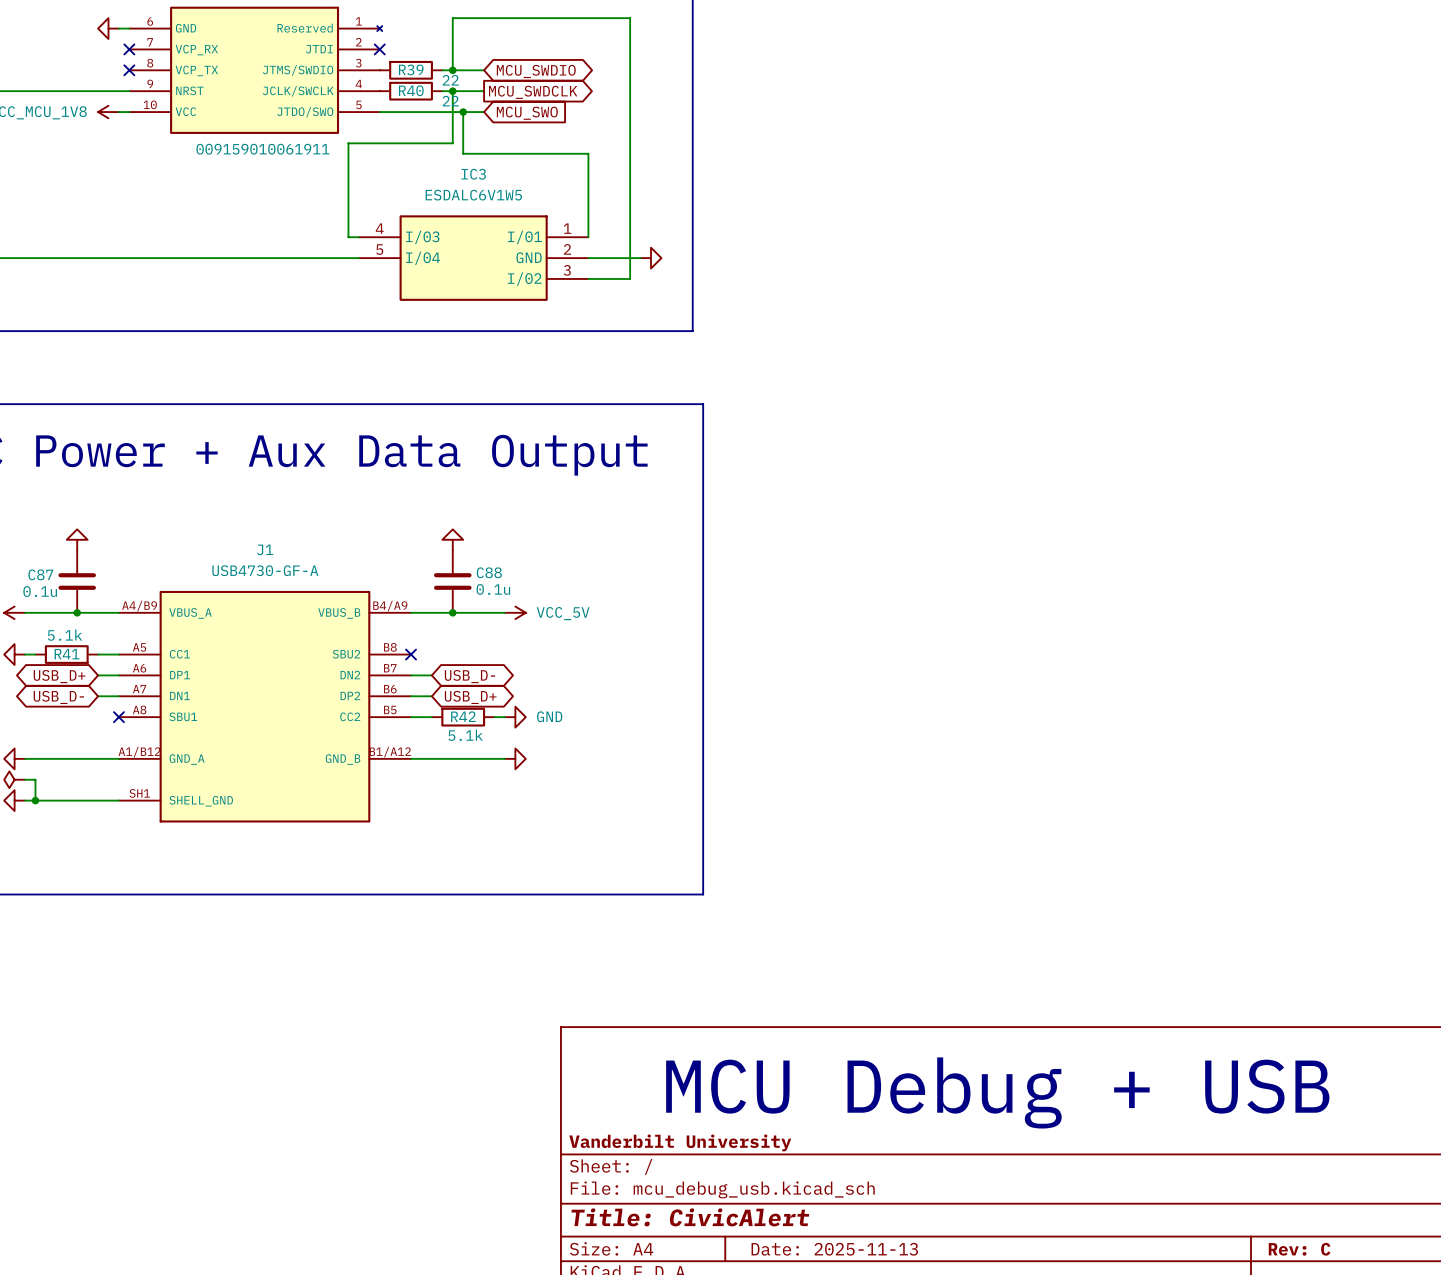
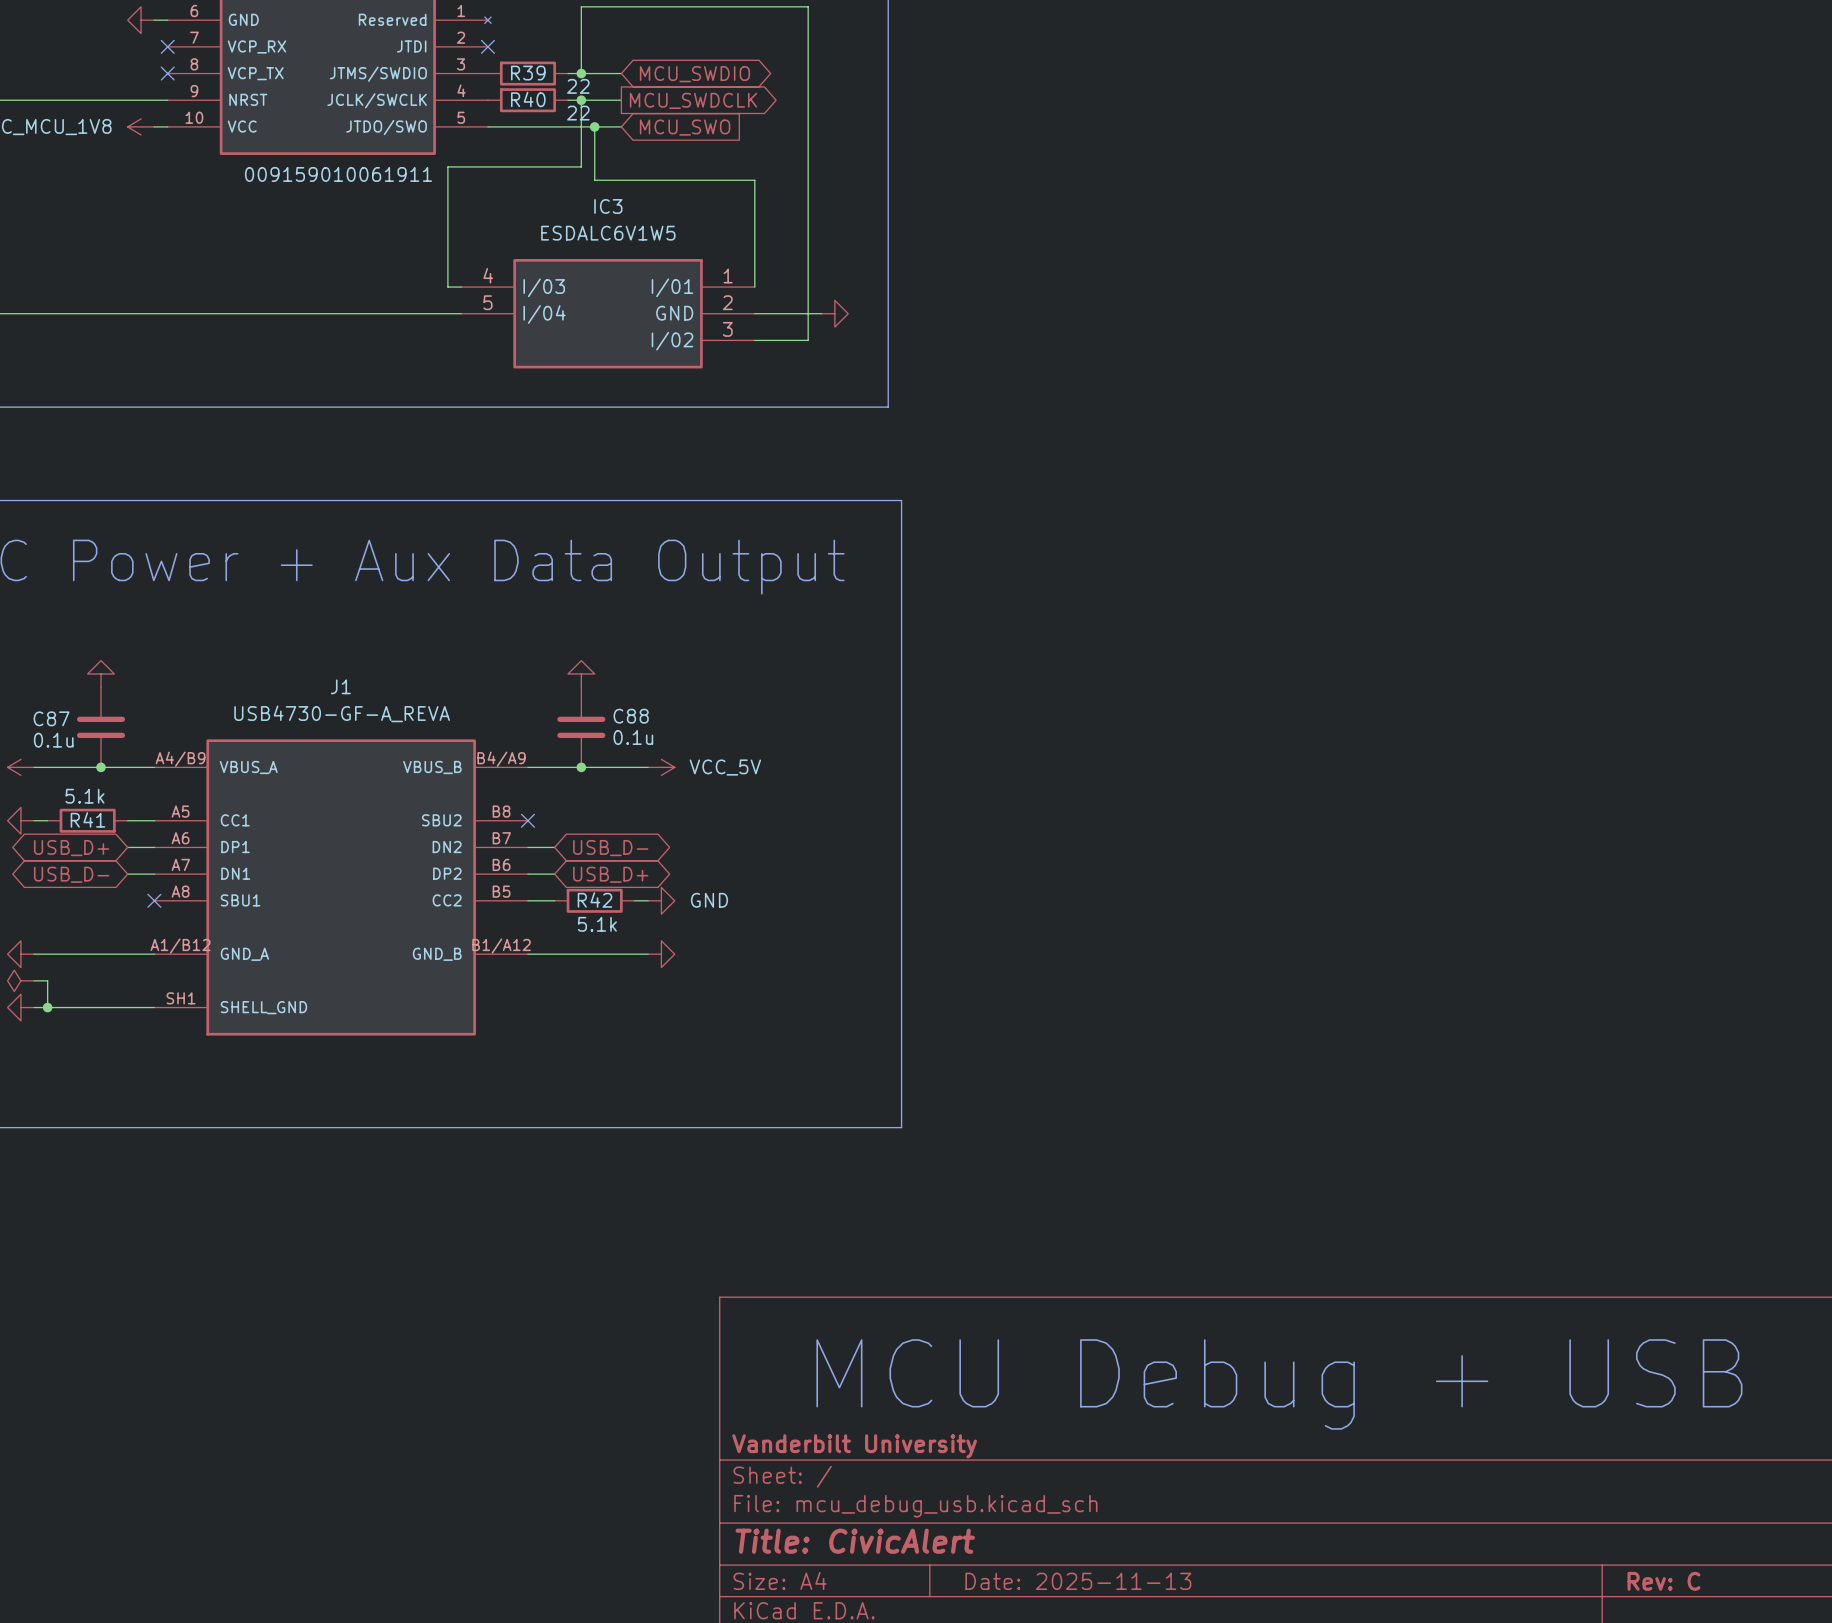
J1 value: USB4730-GF-A (265, 570) -> USB4730-GF-A_REVA (342, 713)

